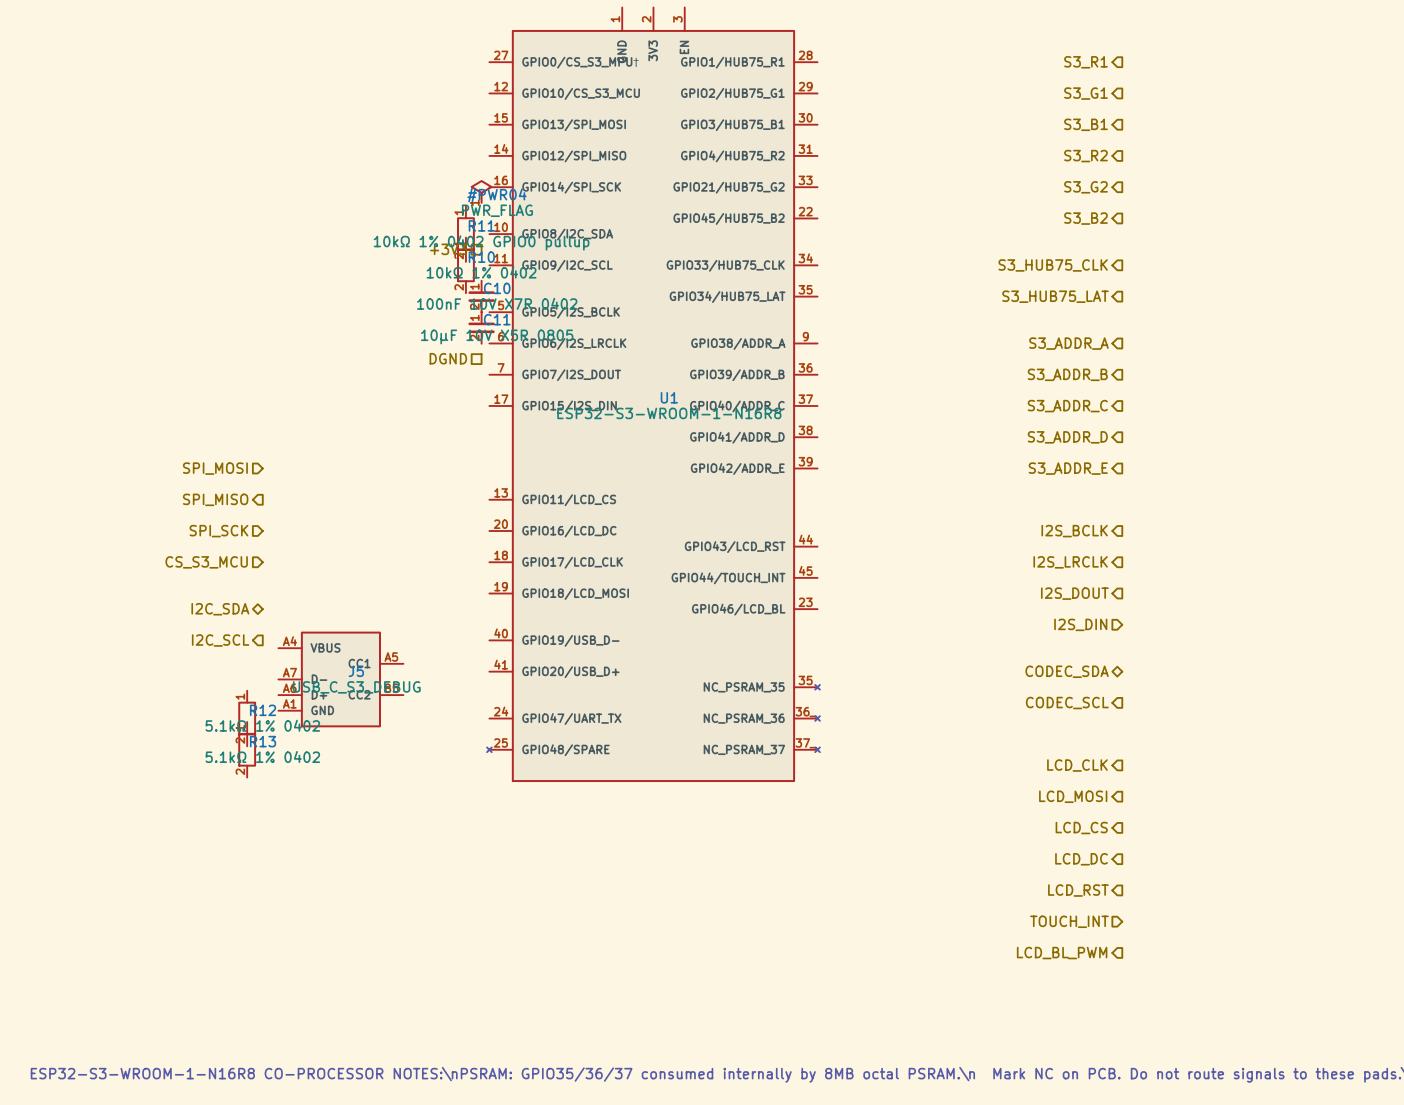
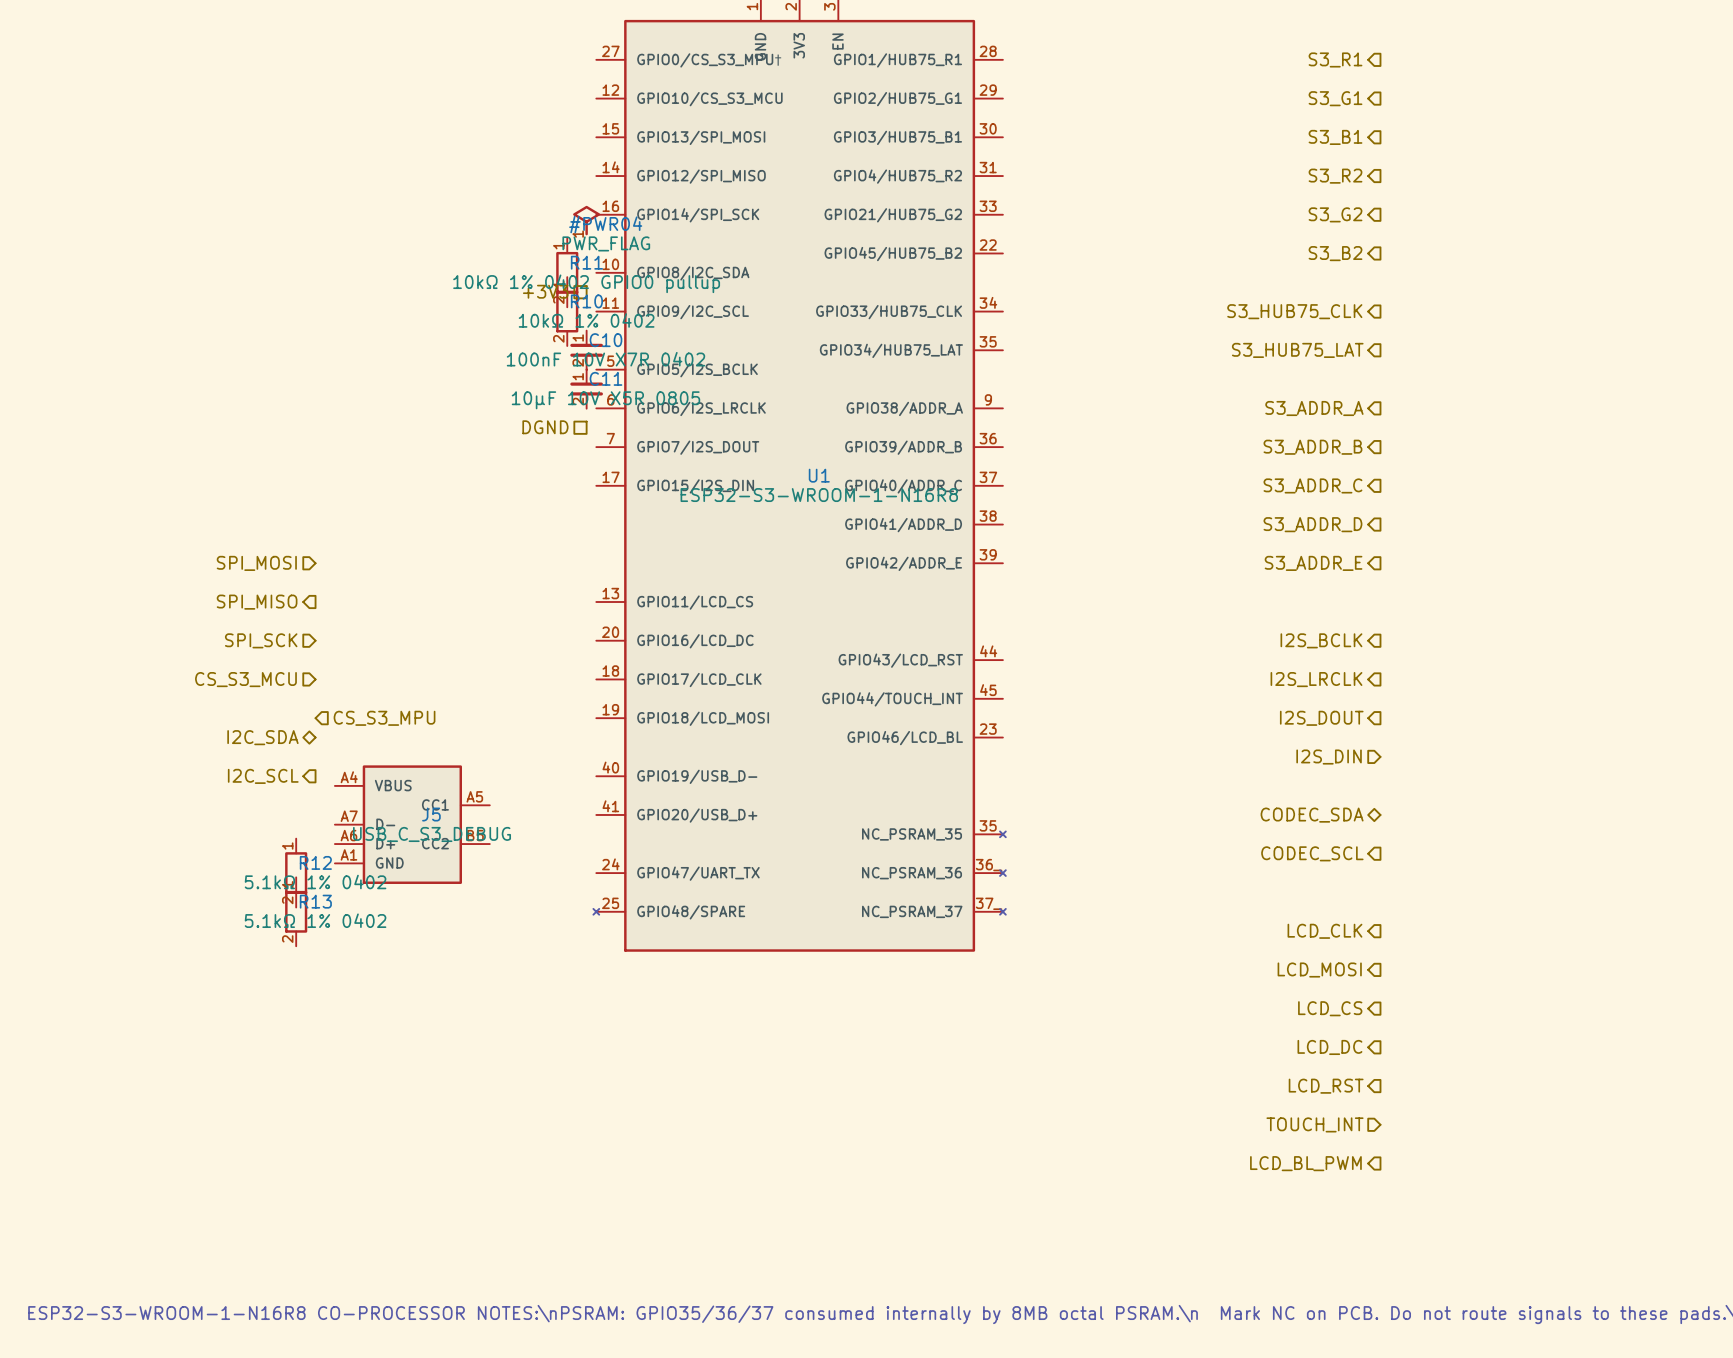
hierarchical label: none -> CS_S3_MPU (384, 718)

